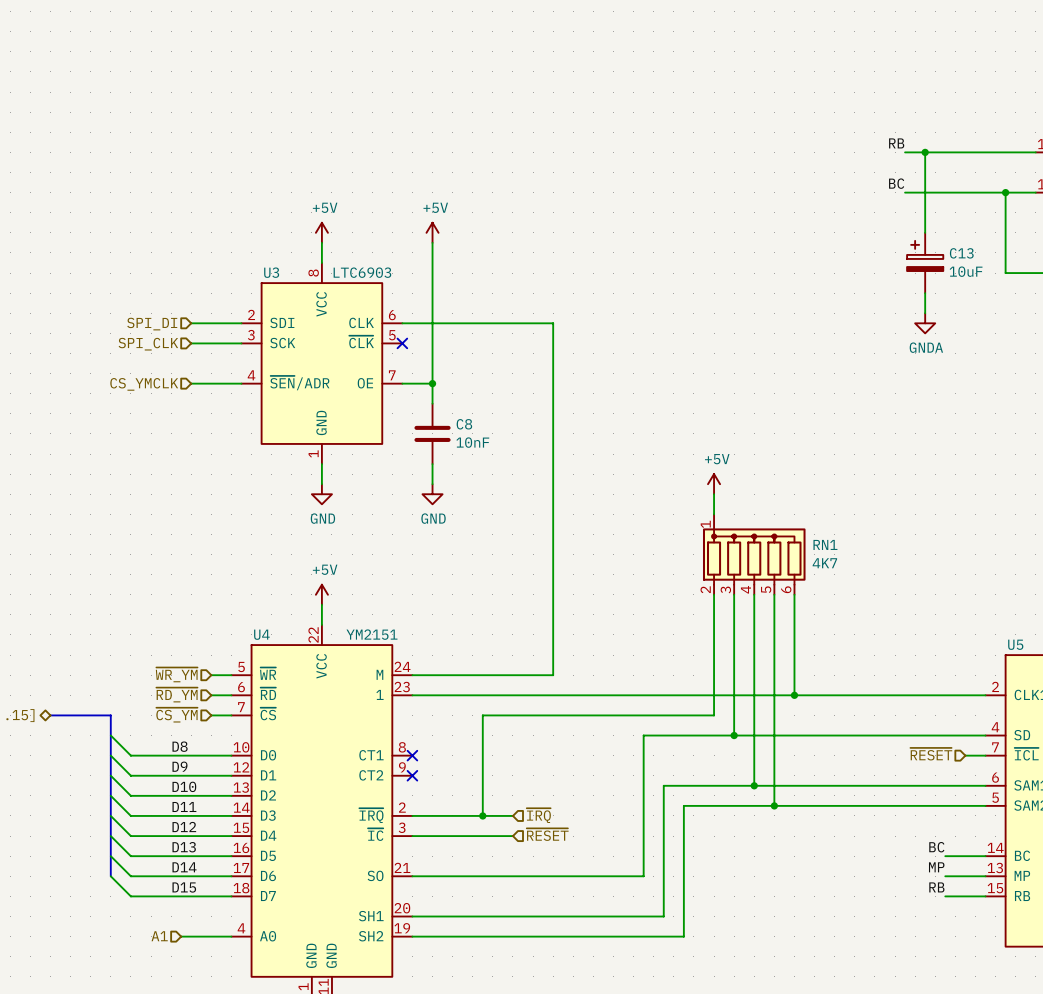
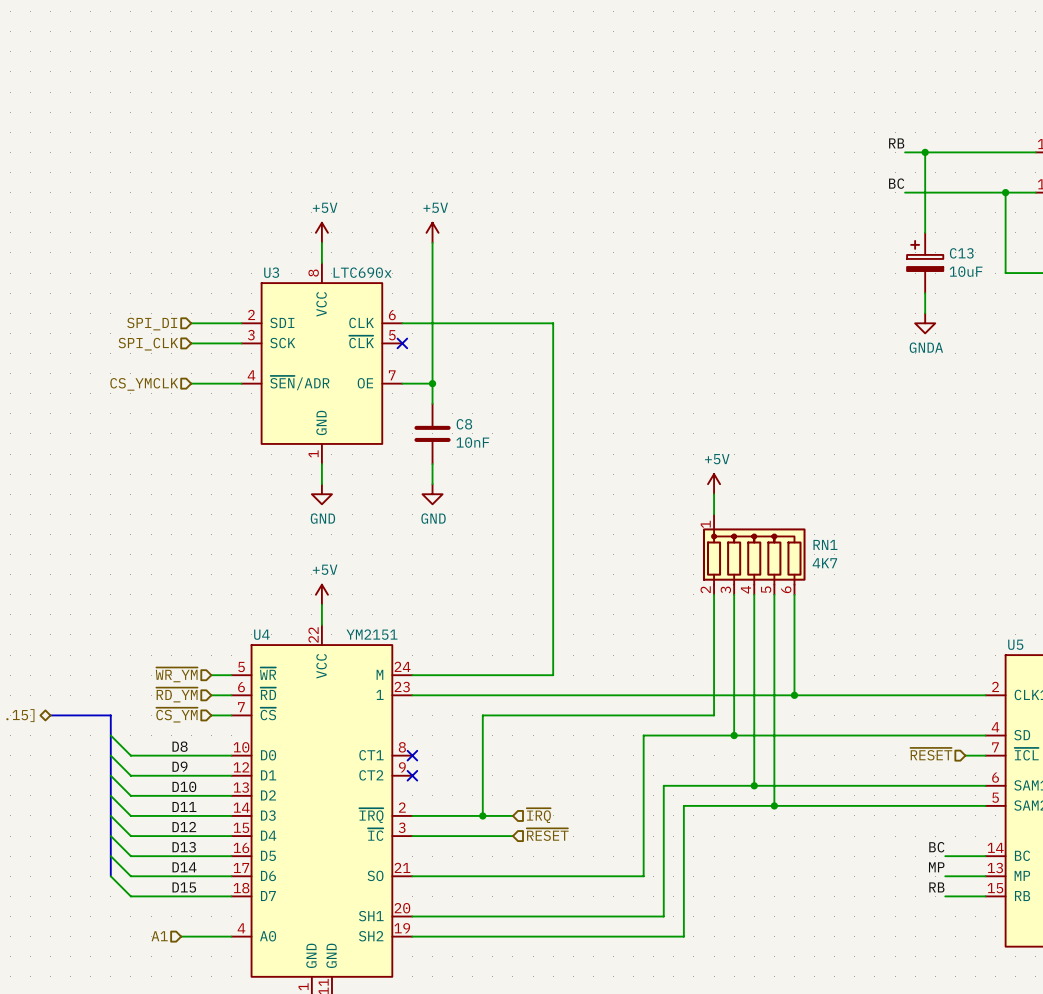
U3 value: LTC6903 (362, 272) -> LTC690x (362, 272)

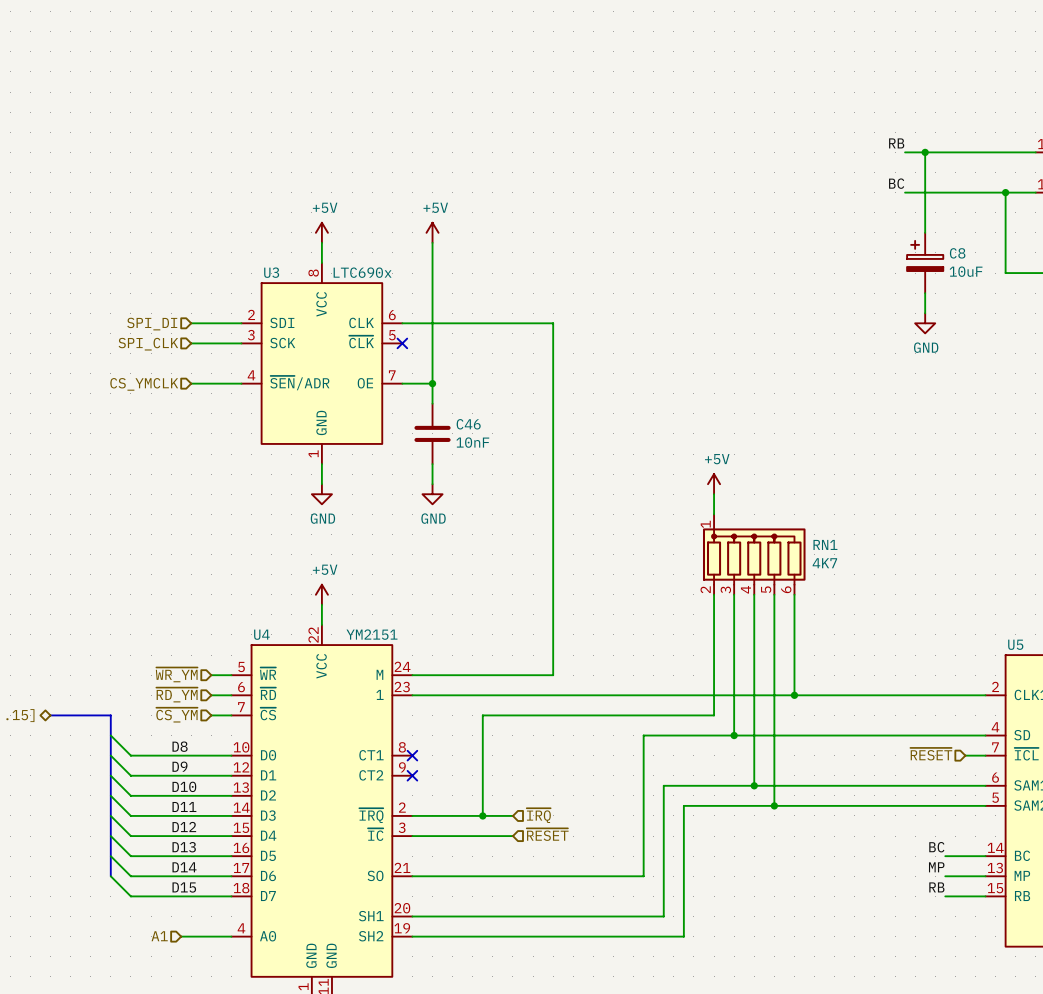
C13 name: C13 (961, 253) -> C8 (957, 253)
power symbol: GNDA (925, 323) -> GND (925, 323)
C8 name: C8 (464, 424) -> C46 (468, 424)

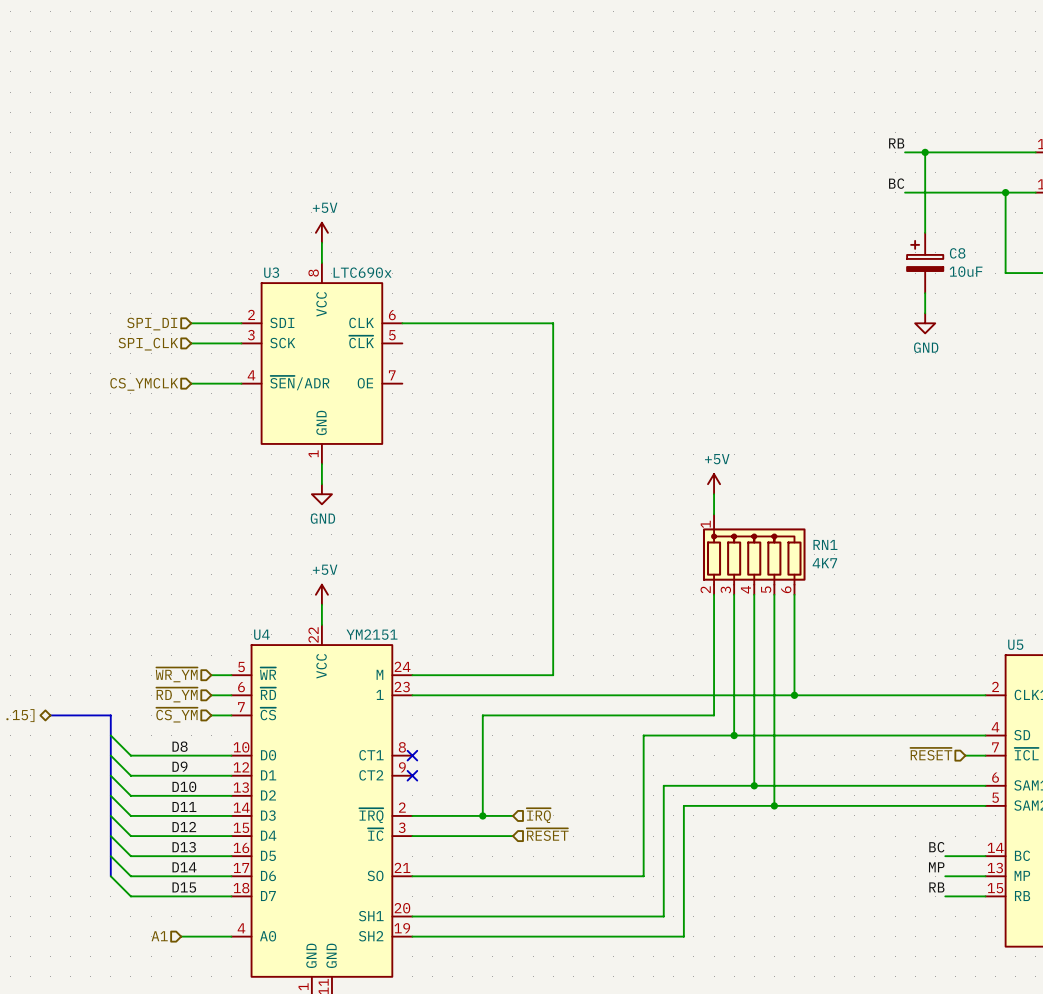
power symbol: +5V (432, 232) -> none
wire: (432, 242) (432, 403) -> none
no-connect mark: (402, 343) -> none
wire: (402, 383) (432, 383) -> none
junction: (432, 383) -> none
C46: 10nF (432, 433) -> none
wire: (432, 464) (432, 484) -> none
power symbol: GND (432, 494) -> none

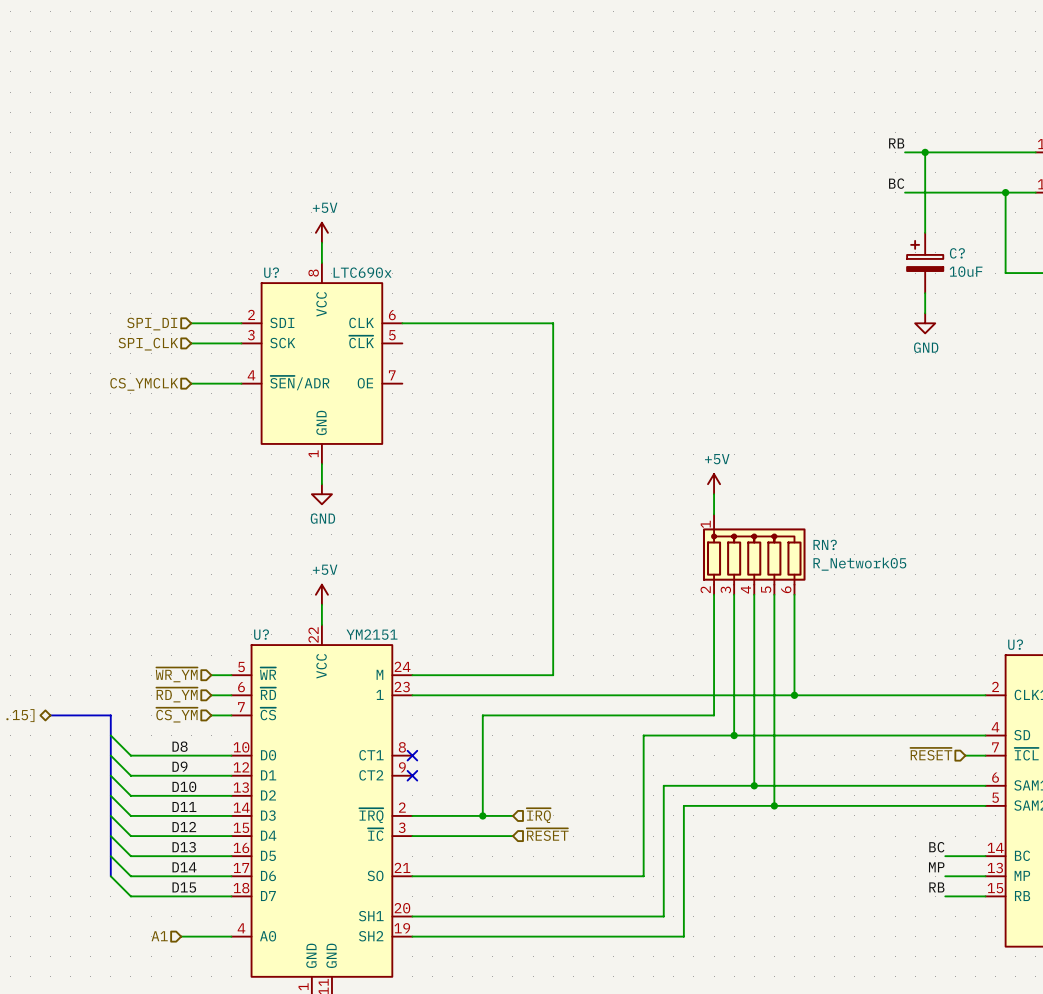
C8 name: C8 (957, 253) -> C? (957, 253)
U3 name: U3 (271, 272) -> U? (271, 272)
RN1 name: RN1 (825, 544) -> RN? (825, 544)
RN1 value: 4K7 (824, 563) -> R_Network05 (859, 564)
U4 name: U4 (261, 634) -> U? (261, 634)
U5 name: U5 (1015, 644) -> U? (1015, 644)

